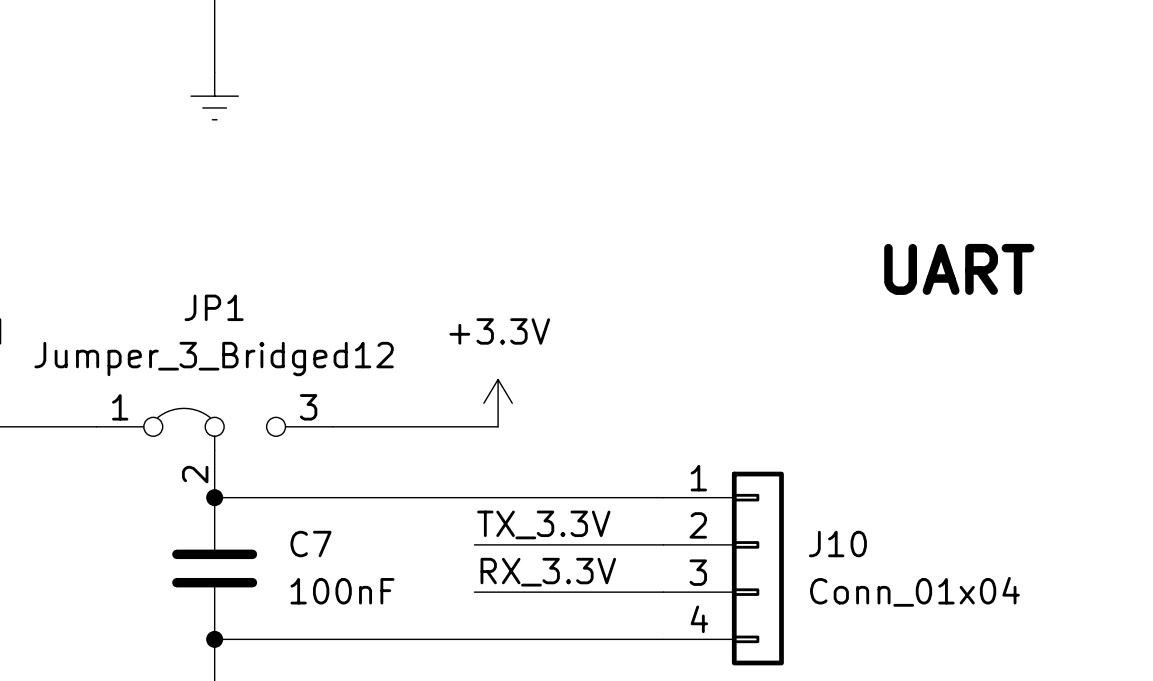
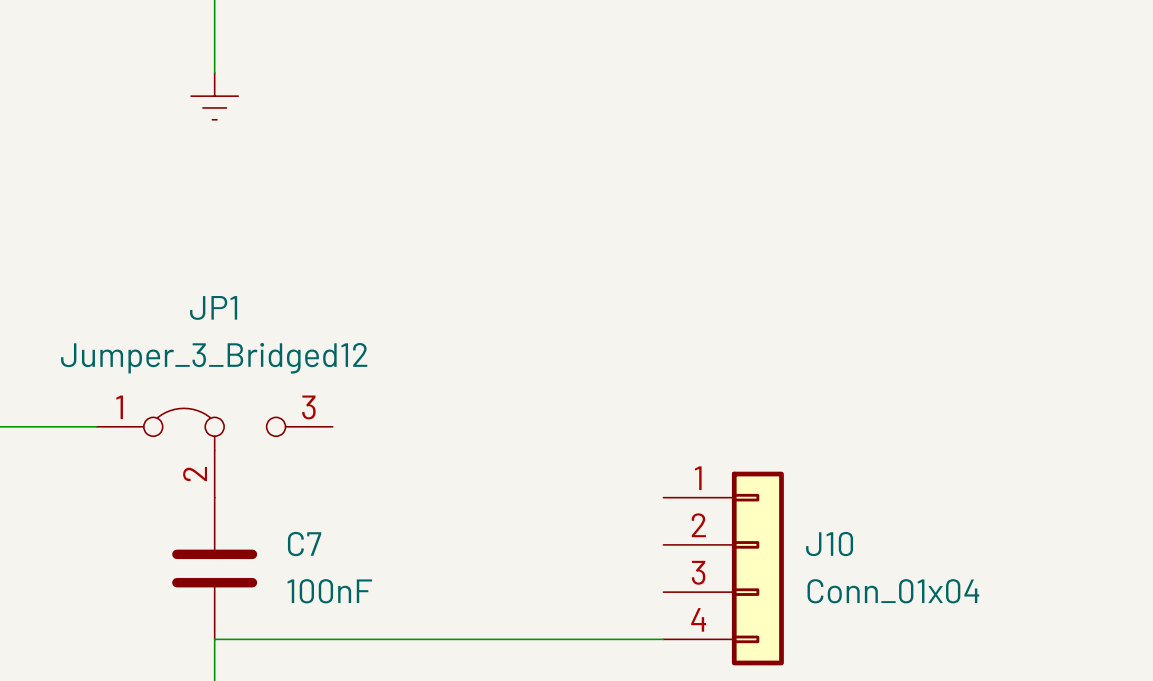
text: UART (959, 269) -> none
power symbol: +3.3V (498, 403) -> none
wire: (332, 426) (498, 426) -> none
wire: (214, 497) (663, 497) -> none
junction: (214, 497) -> none
label: TX_3.3V (543, 524) -> none
wire: (474, 544) (663, 544) -> none
label: RX_3.3V (548, 572) -> none
wire: (474, 592) (663, 592) -> none
junction: (214, 639) -> none

